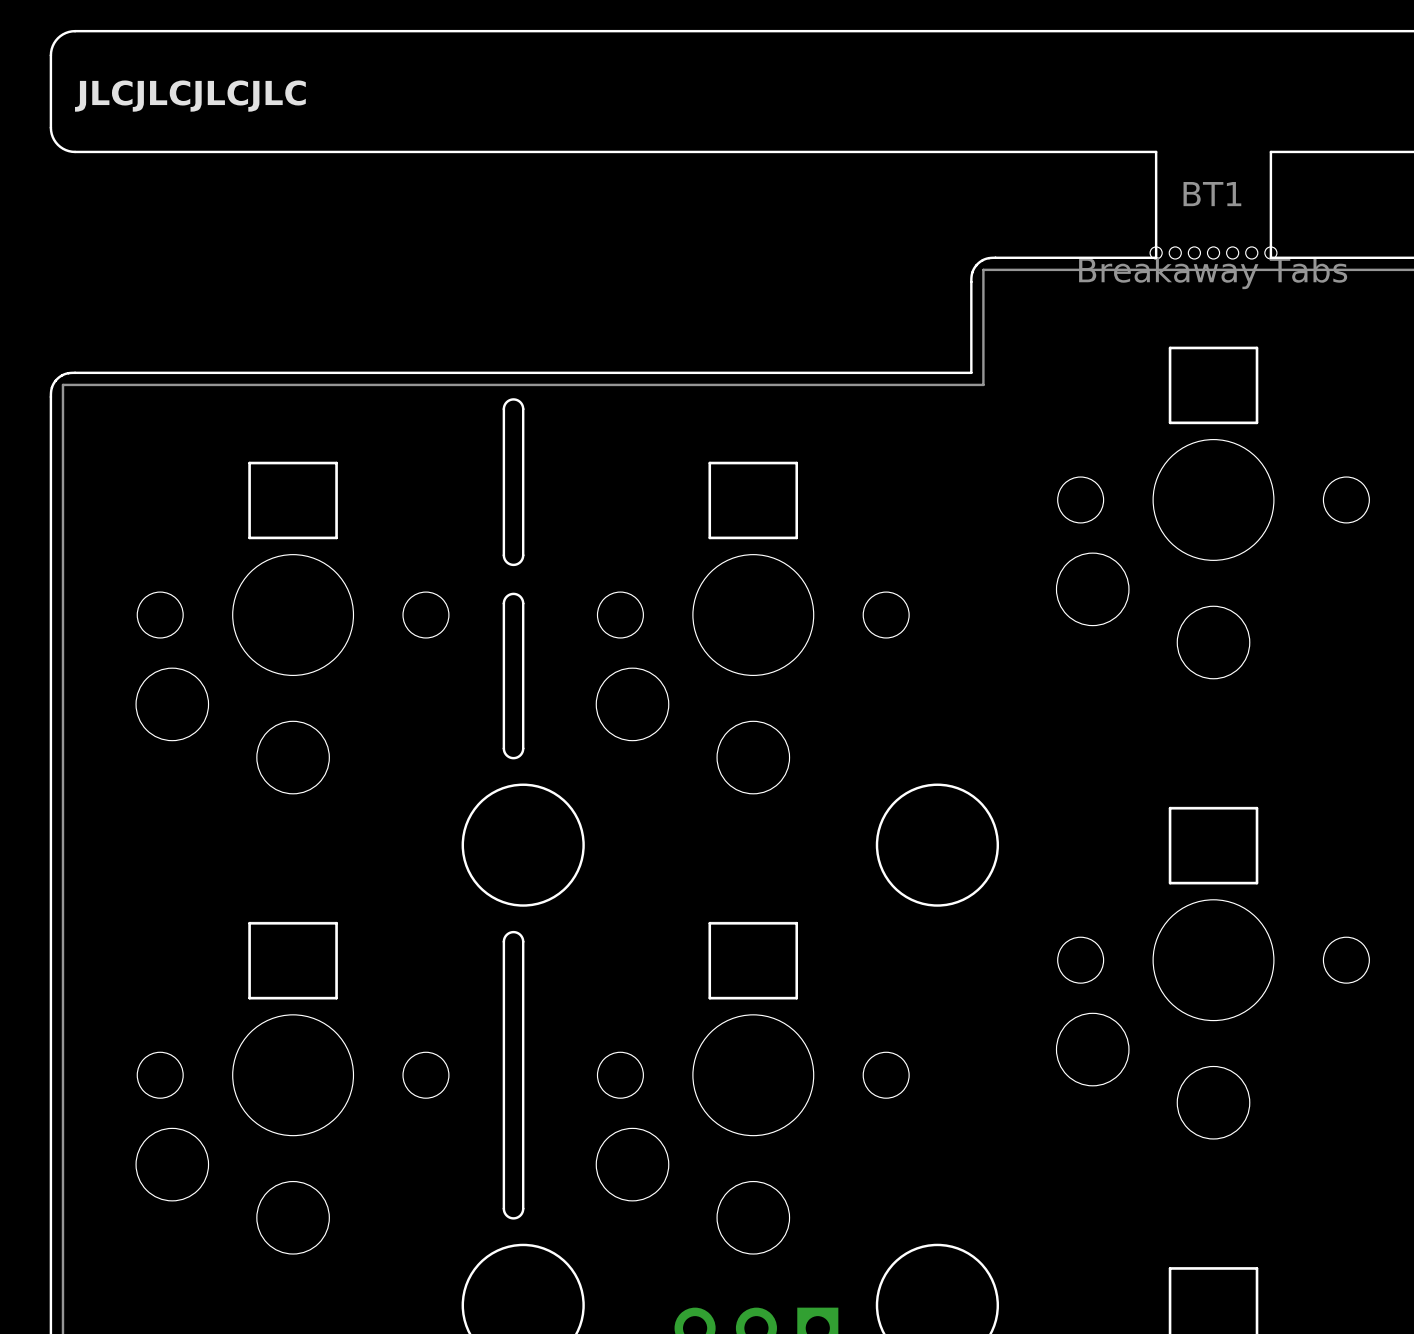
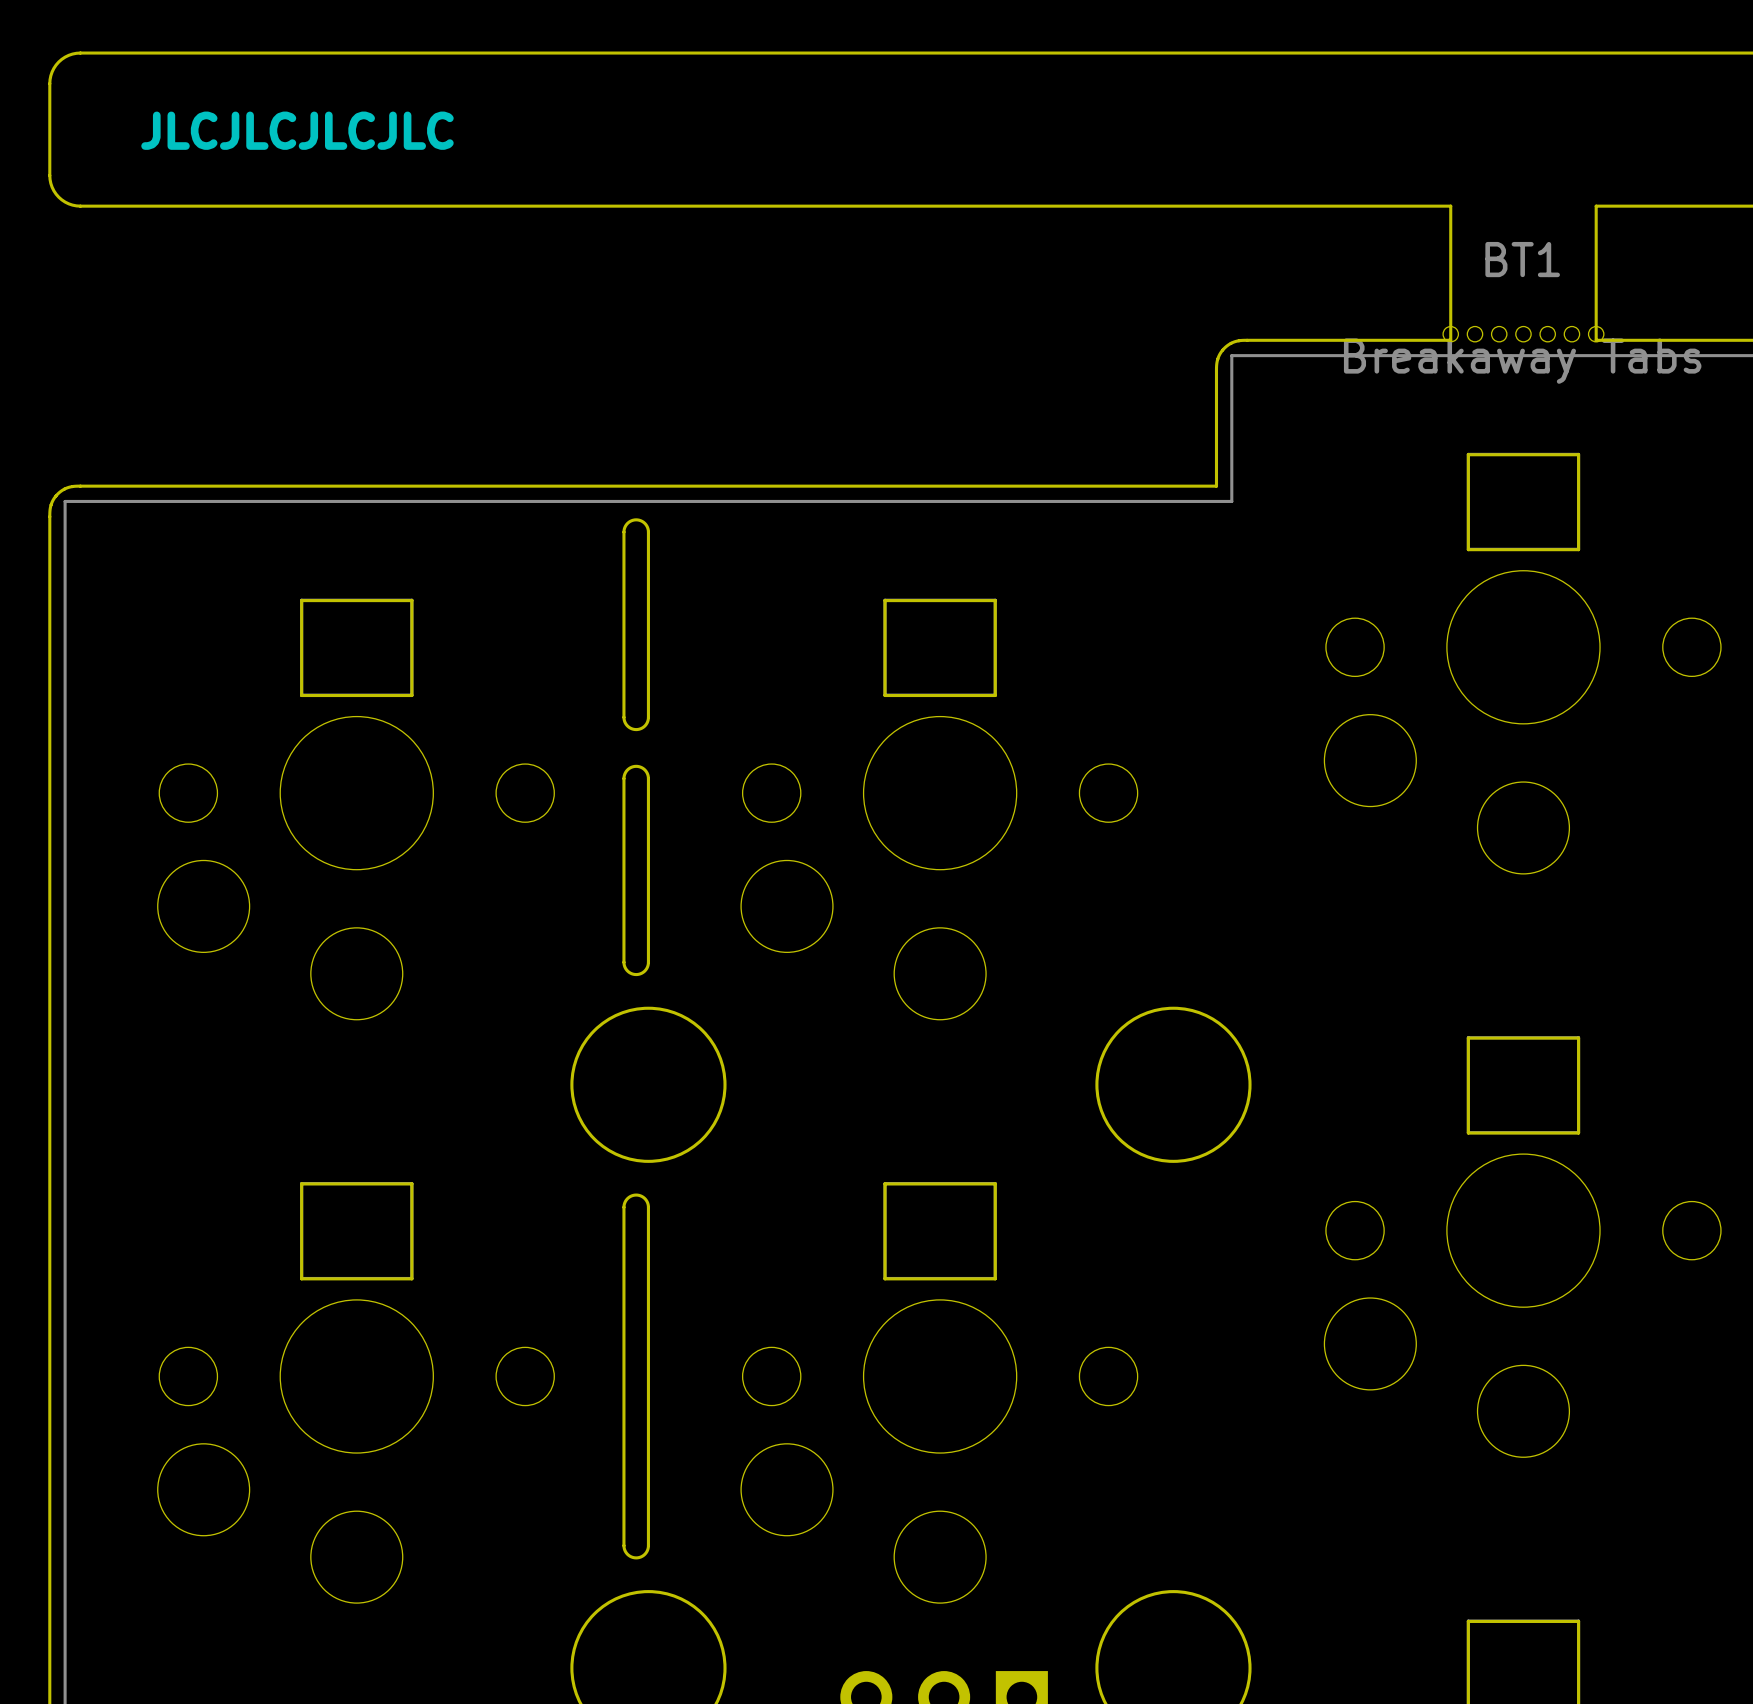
text position: JLCJLCJLCJLC (190, 96) -> JLCJLCJLCJLC (297, 130)

